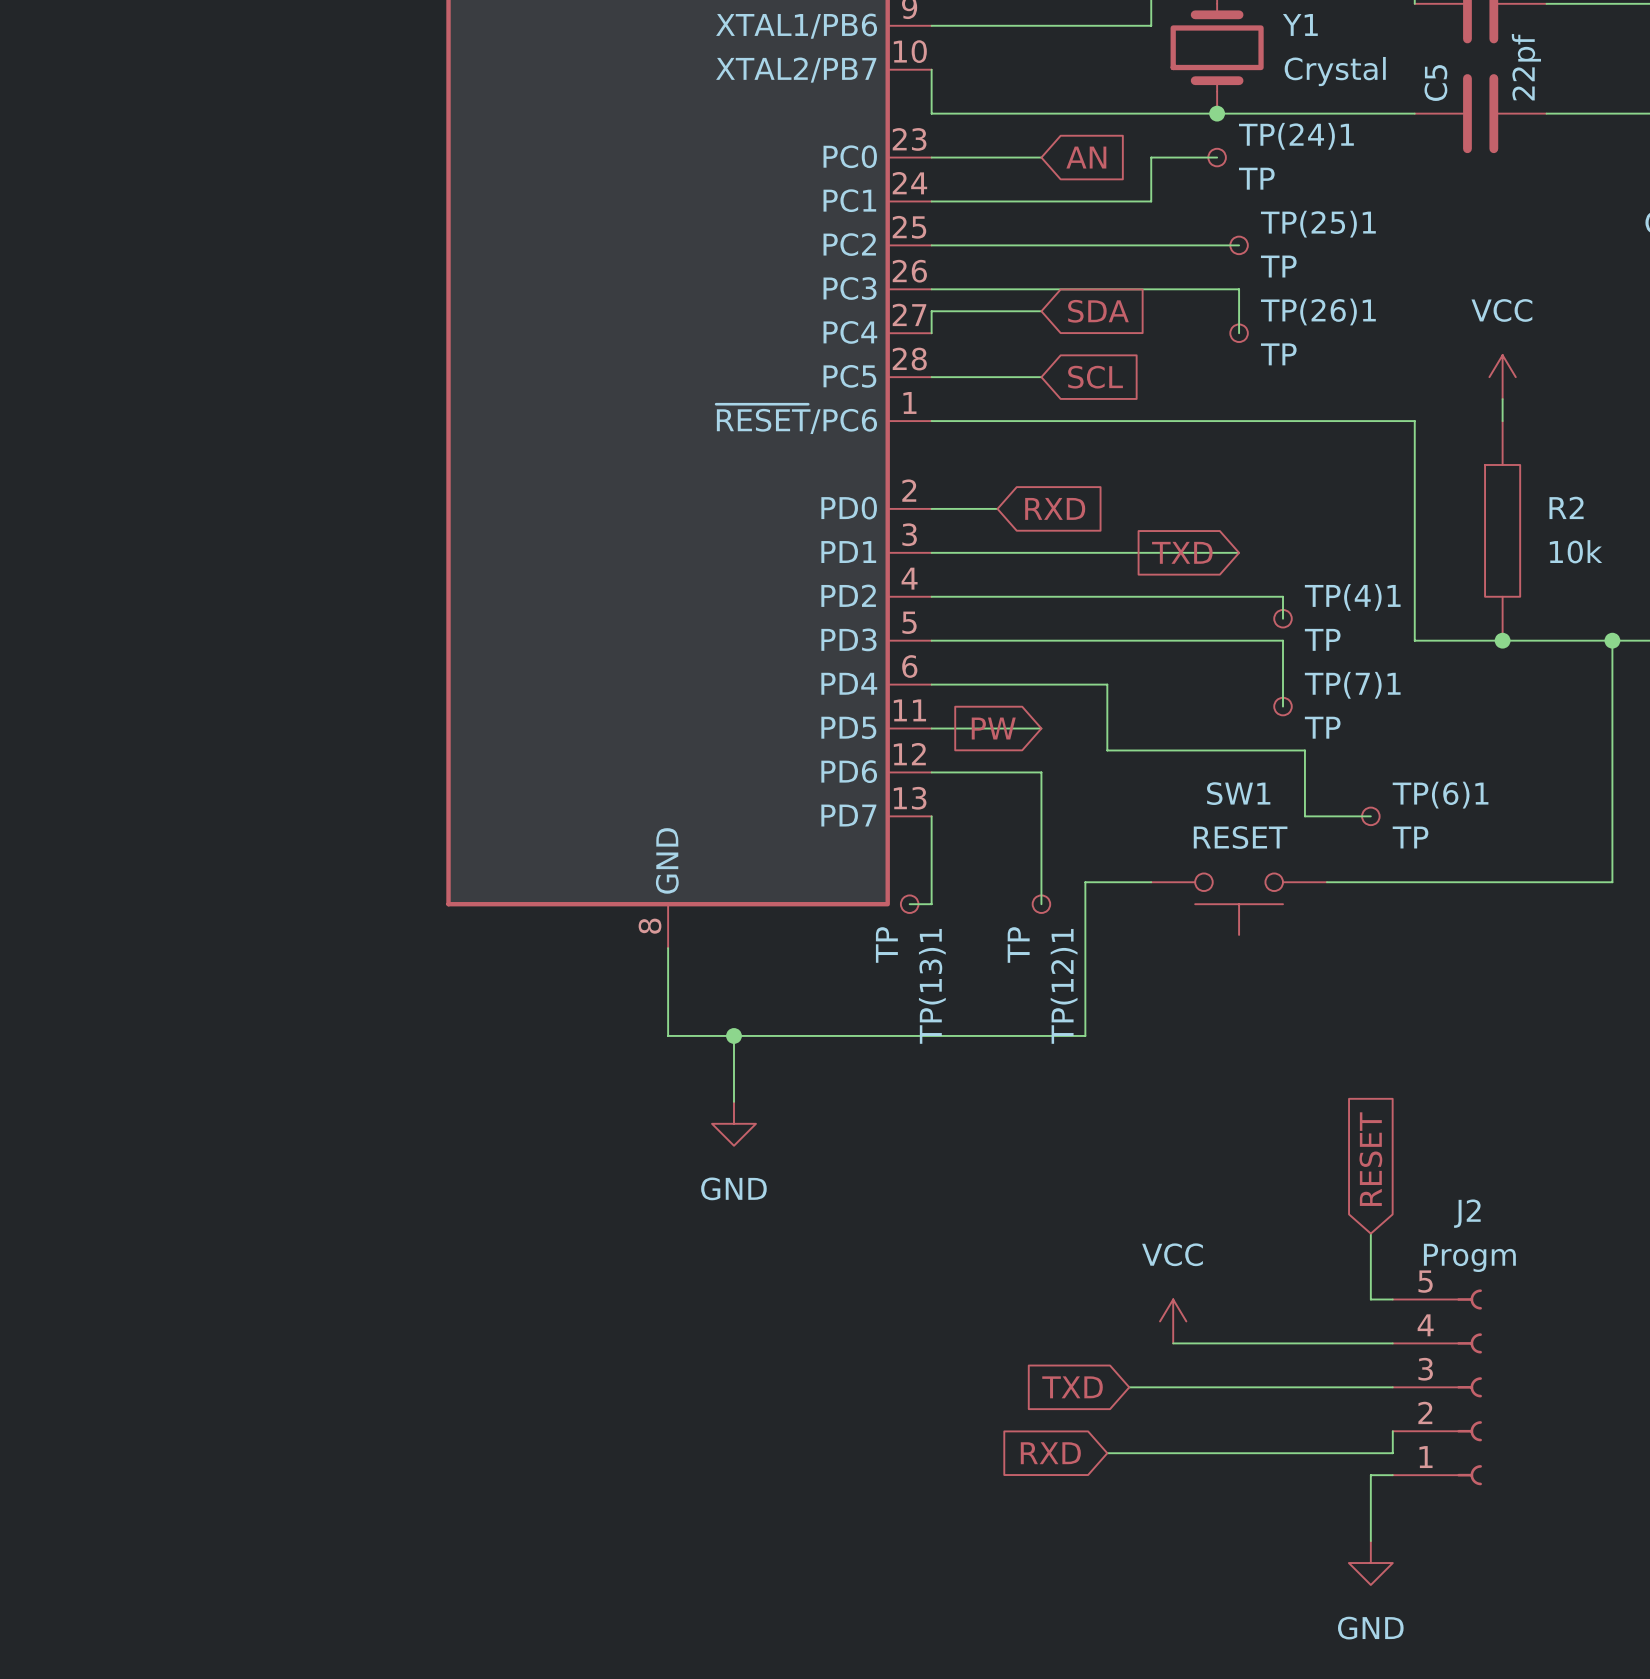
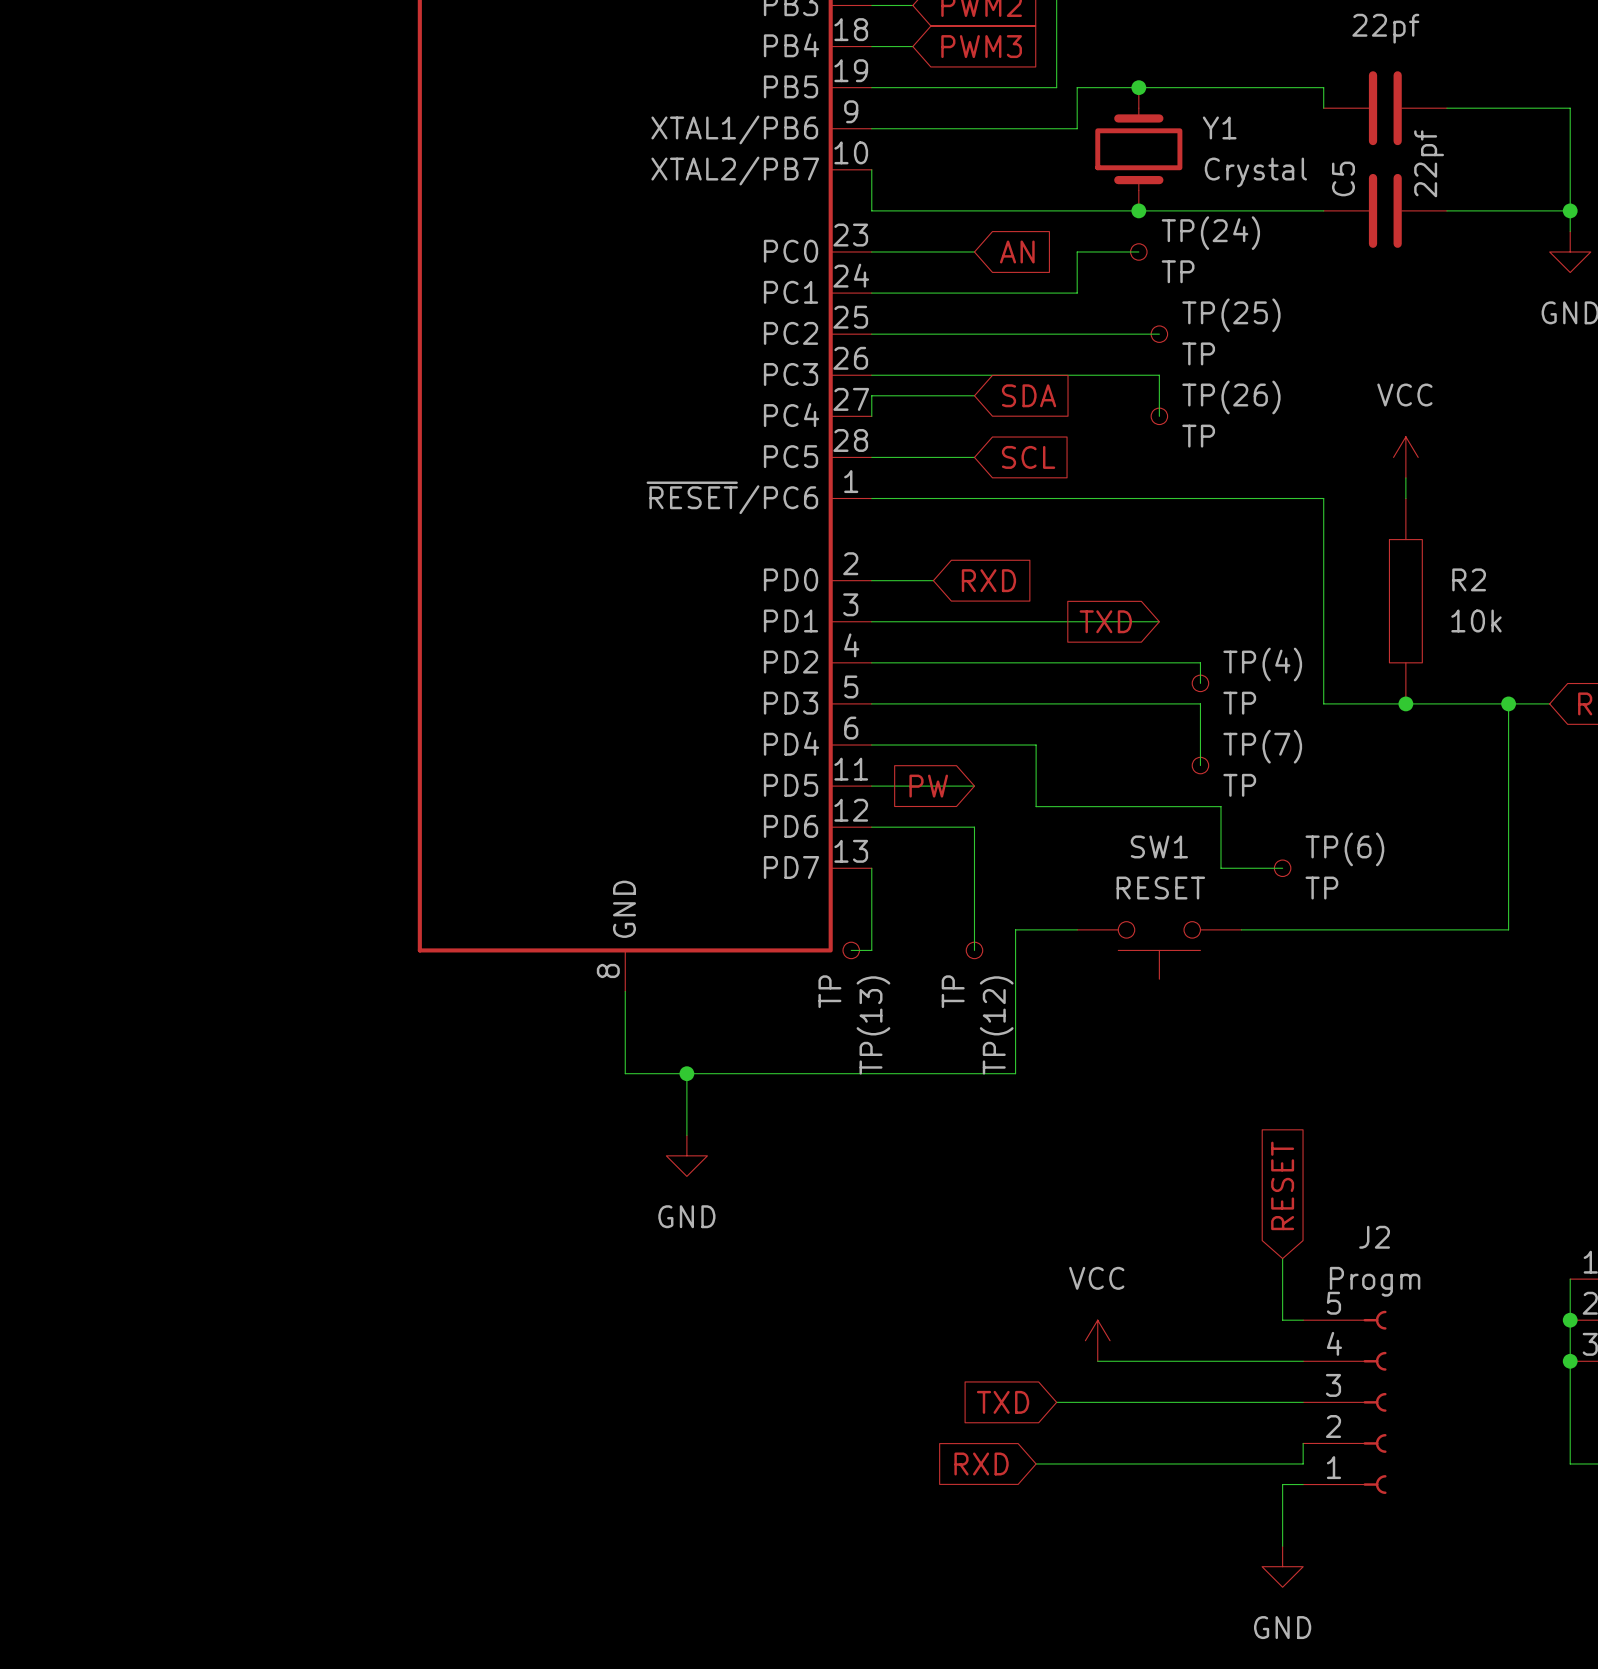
TP(24)1 name: TP(24)1 (1296, 136) -> TP(24) (1210, 233)
TP(25)1 name: TP(25)1 (1318, 224) -> TP(25) (1231, 315)
TP(26)1 name: TP(26)1 (1318, 311) -> TP(26) (1231, 397)
TP(4)1 name: TP(4)1 (1352, 597) -> TP(4) (1262, 664)
TP(7)1 name: TP(7)1 (1352, 685) -> TP(7) (1262, 746)
TP(6)1 name: TP(6)1 (1440, 795) -> TP(6) (1344, 849)
TP(13)1 name: TP(13)1 (932, 986) -> TP(13) (873, 1025)
TP(12)1 name: TP(12)1 (1064, 986) -> TP(12) (996, 1025)

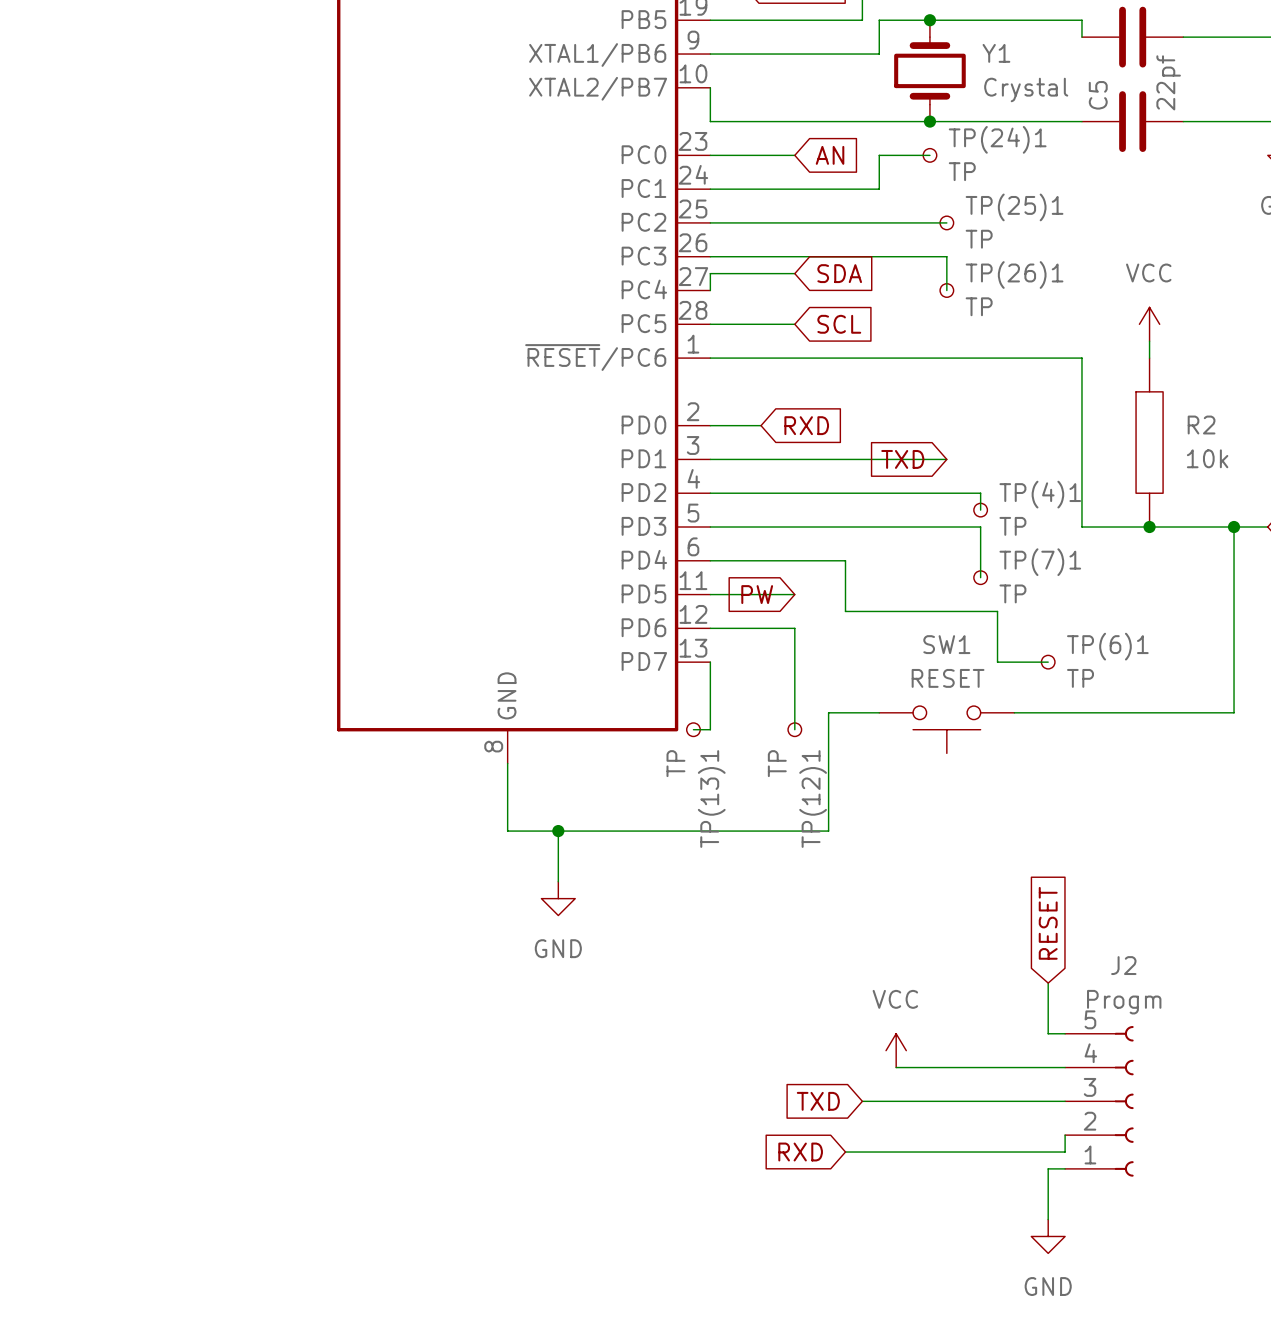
TP(24) name: TP(24) (1210, 233) -> TP(24)1 (997, 139)
TP(25) name: TP(25) (1231, 315) -> TP(25)1 (1014, 207)
TP(26) name: TP(26) (1231, 397) -> TP(26)1 (1014, 274)
TP(4) name: TP(4) (1262, 664) -> TP(4)1 (1040, 494)
TP(7) name: TP(7) (1262, 746) -> TP(7)1 (1040, 562)
TP(6) name: TP(6) (1344, 849) -> TP(6)1 (1107, 646)
TP(13) name: TP(13) (873, 1025) -> TP(13)1 (711, 799)
TP(12) name: TP(12) (996, 1025) -> TP(12)1 (813, 799)

